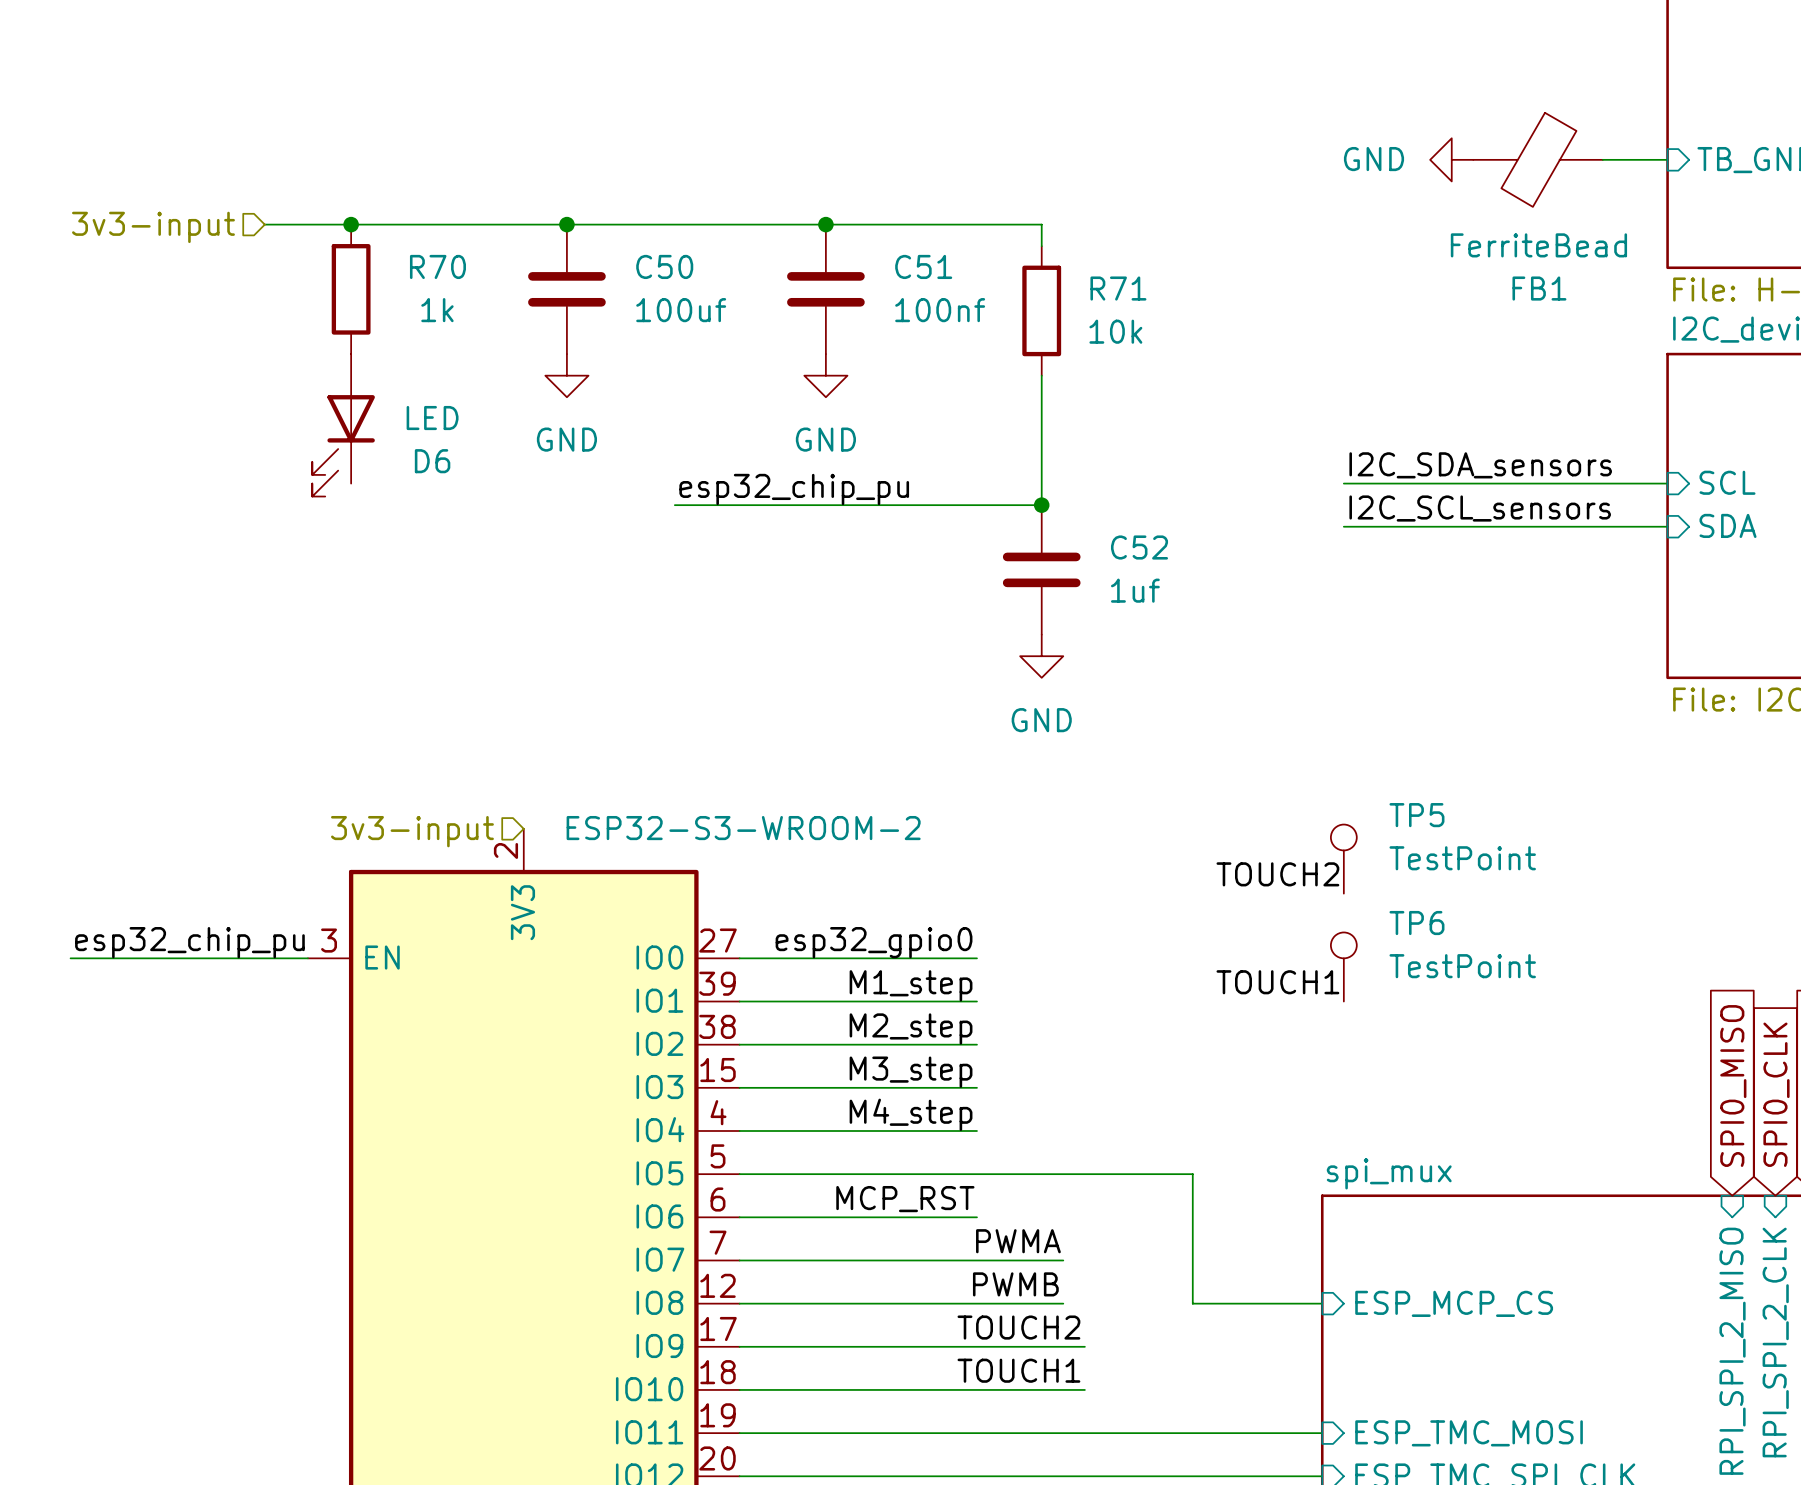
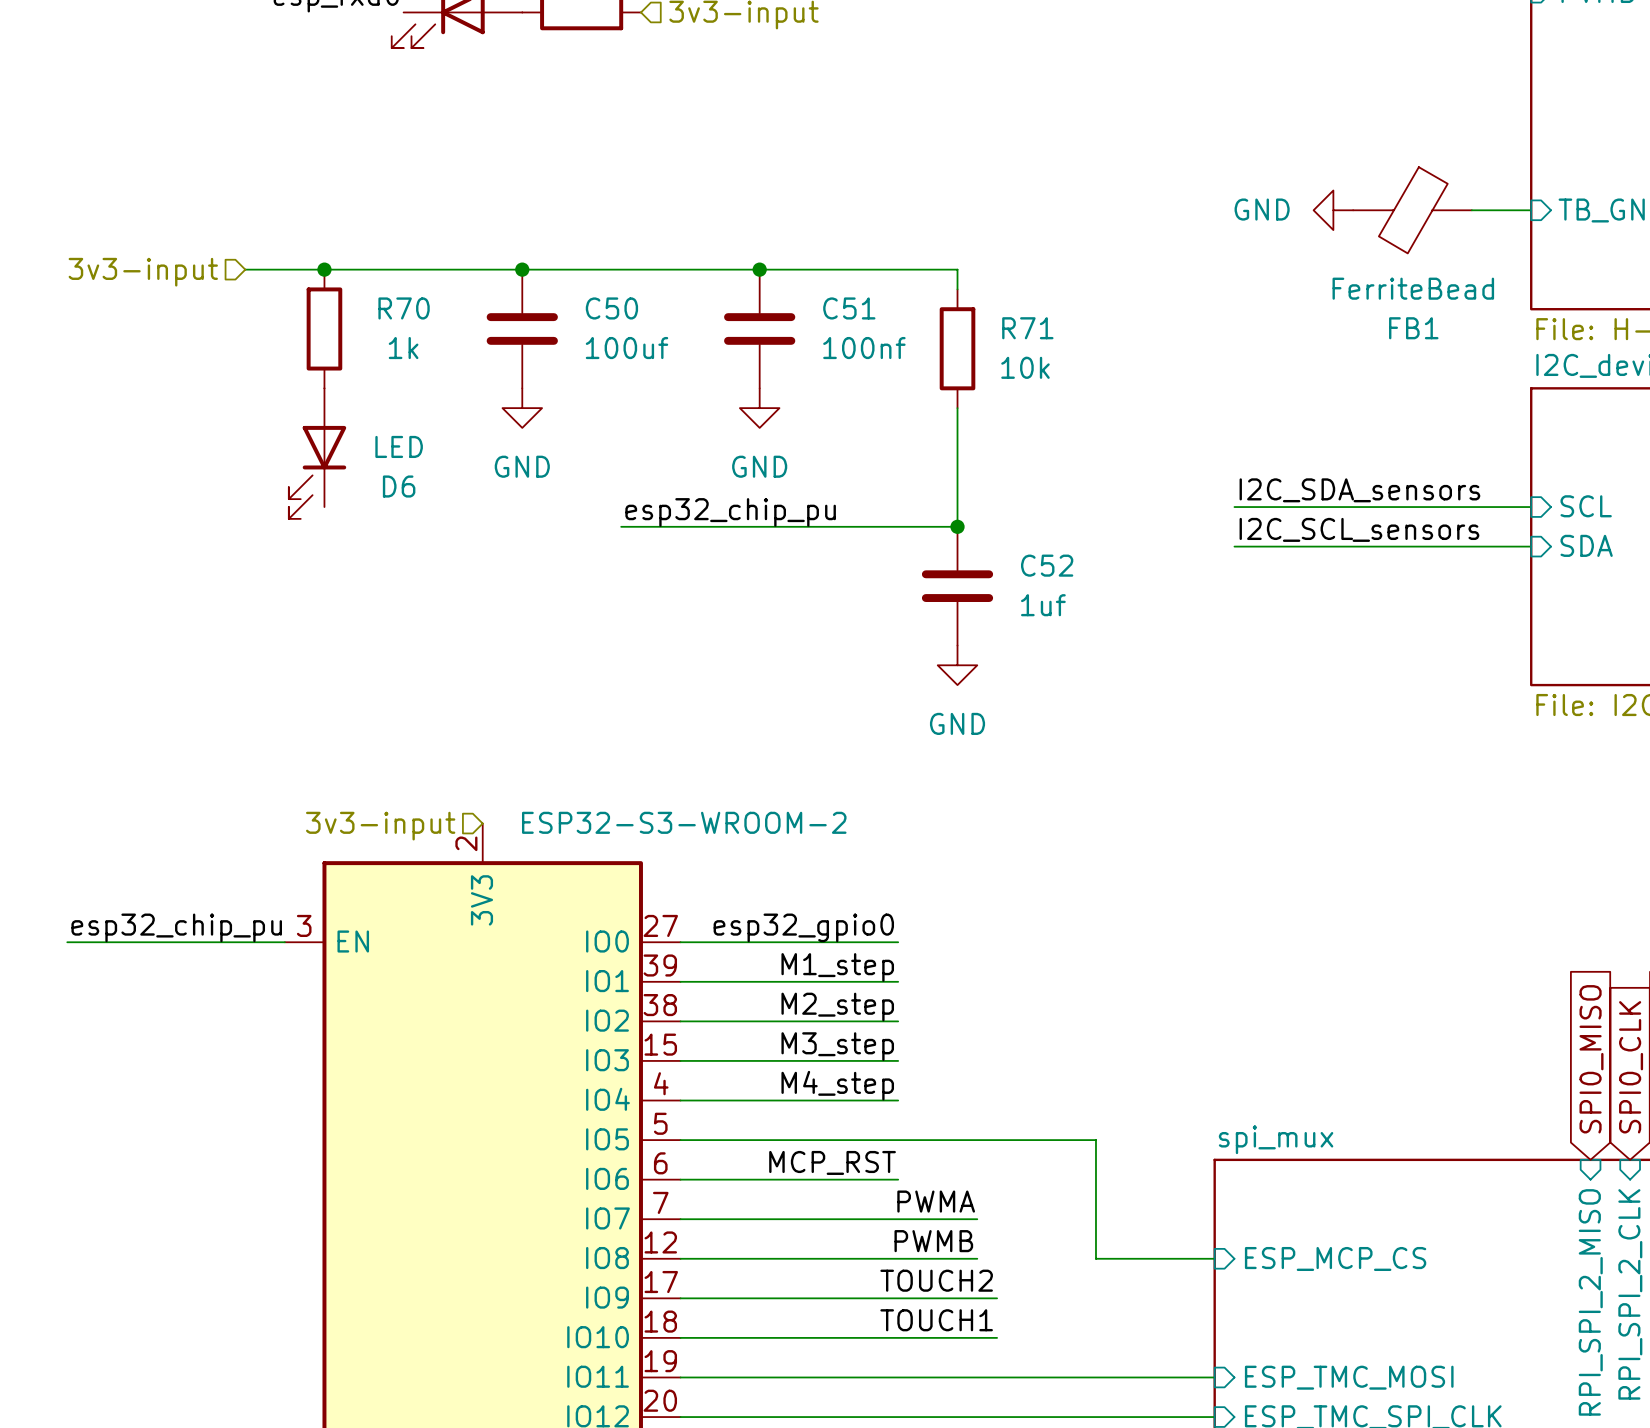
TP5: TestPoint (1343, 859) -> none
label: TOUCH2 (1277, 874) -> none
TP6: TestPoint (1343, 966) -> none
label: TOUCH1 (1277, 982) -> none

